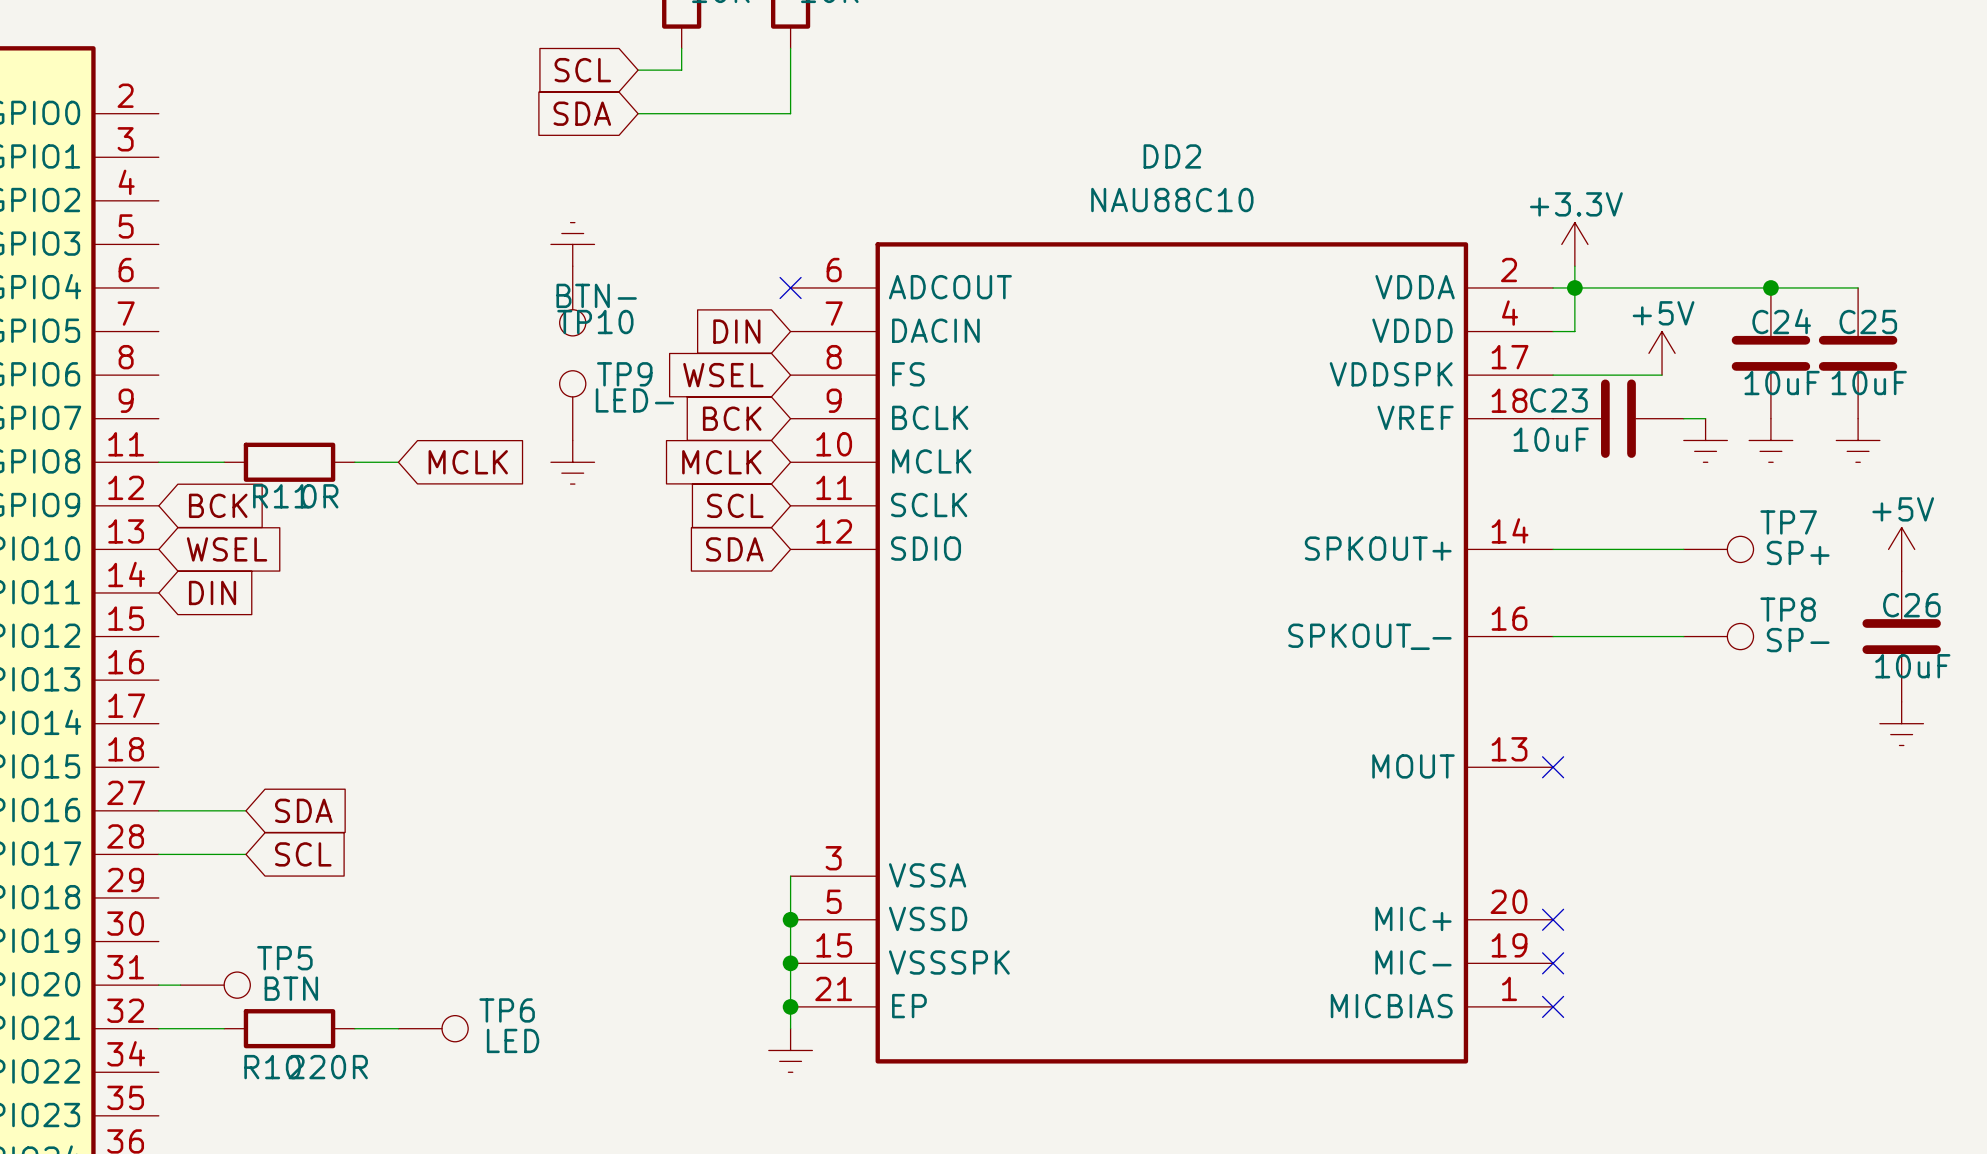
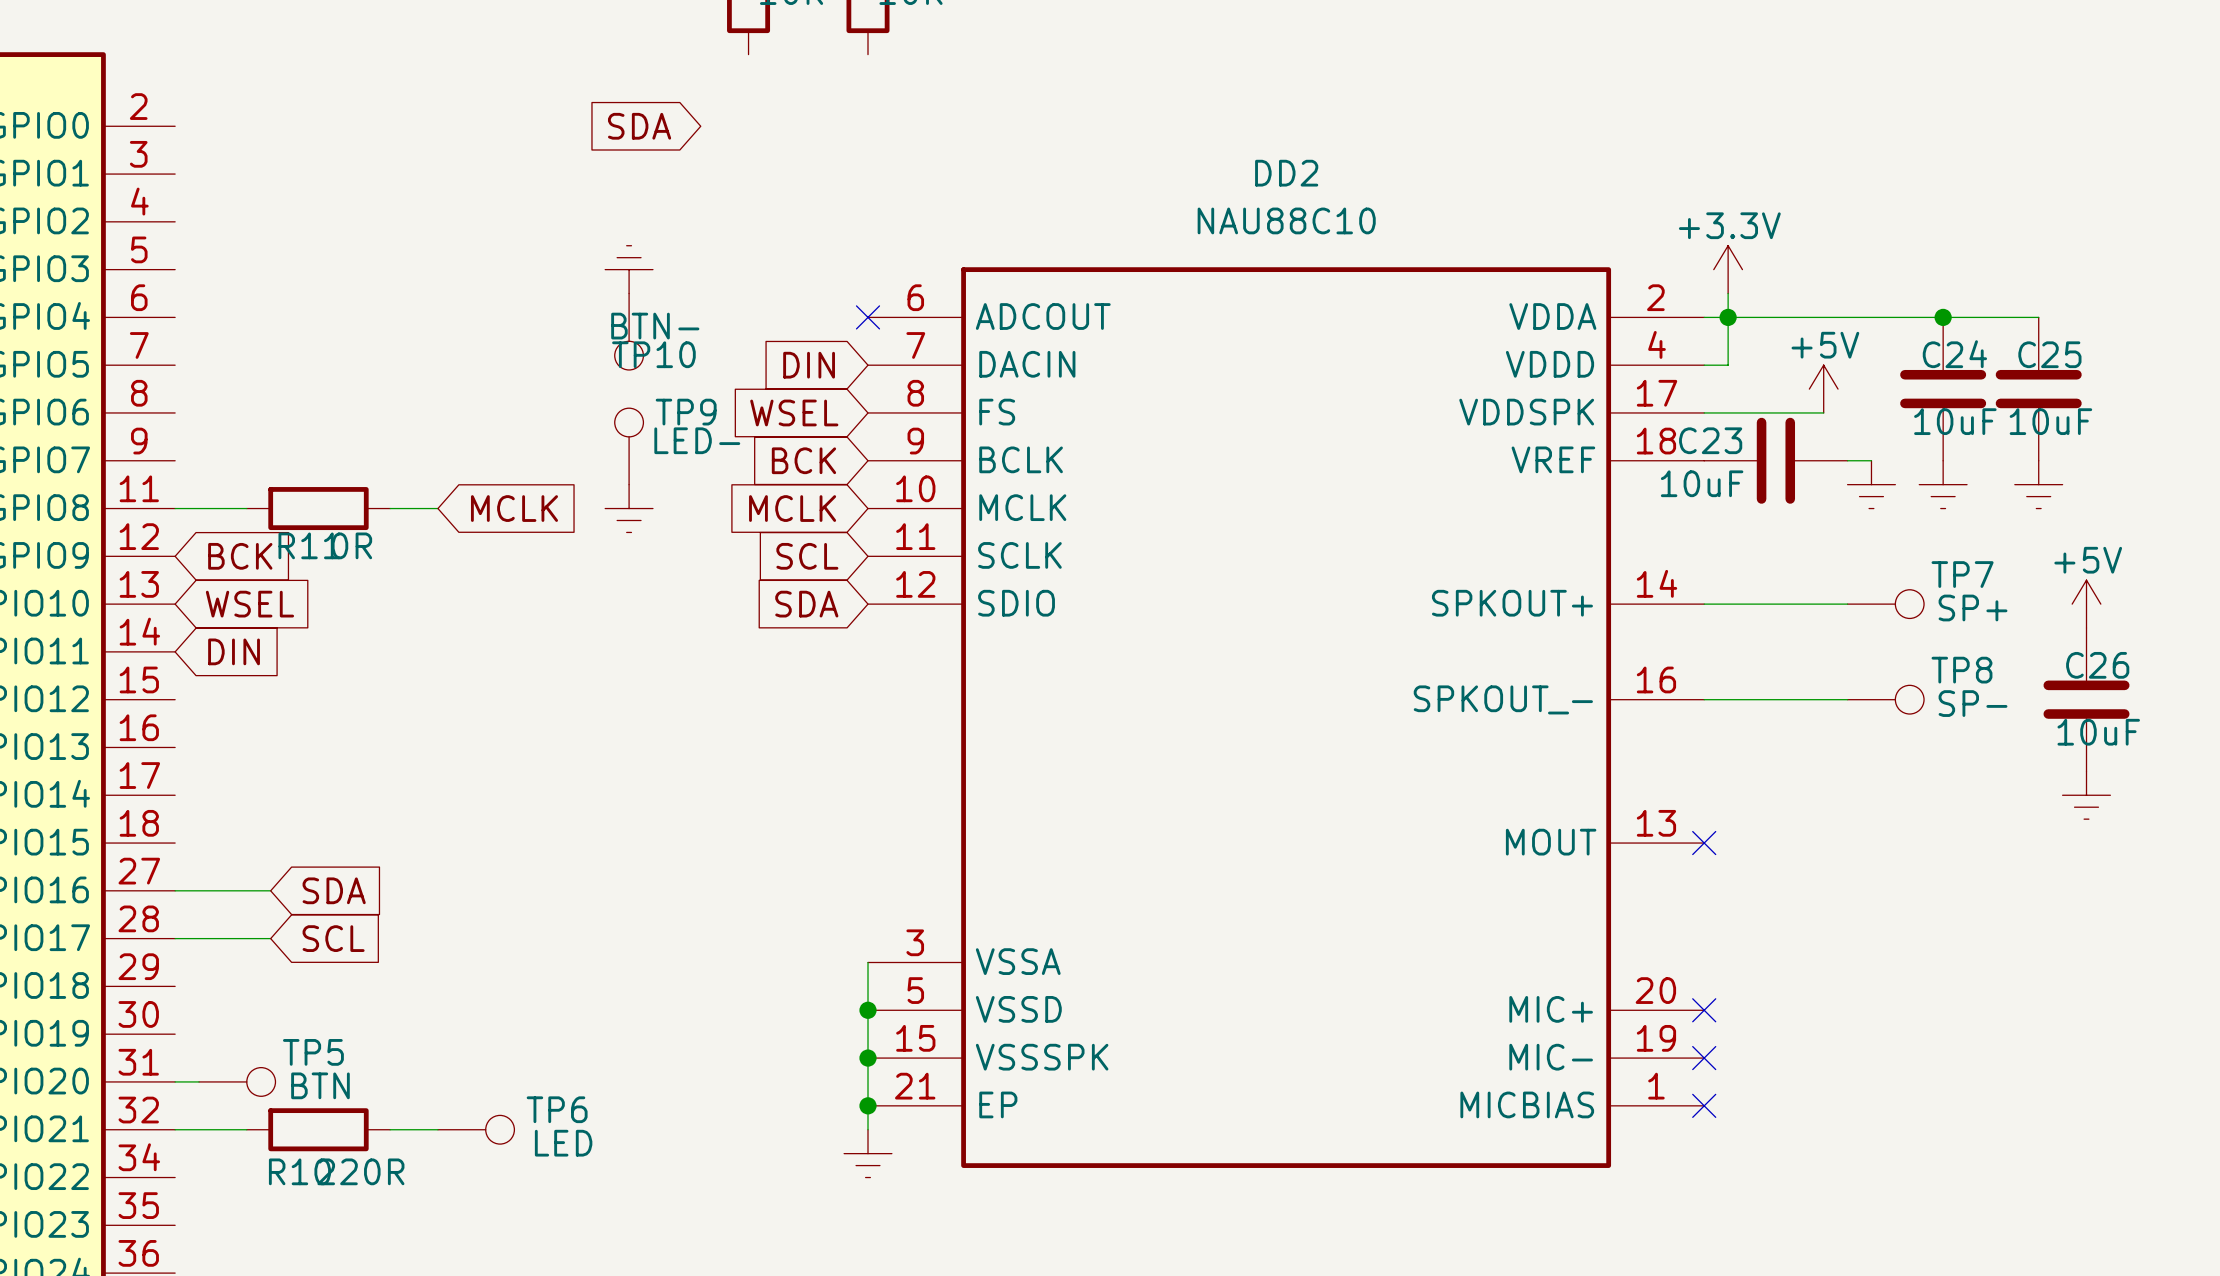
wire: (681, 48) (681, 70) (638, 70) -> none
wire: (790, 48) (790, 113) (638, 113) -> none
global label: SCL (582, 70) -> none

